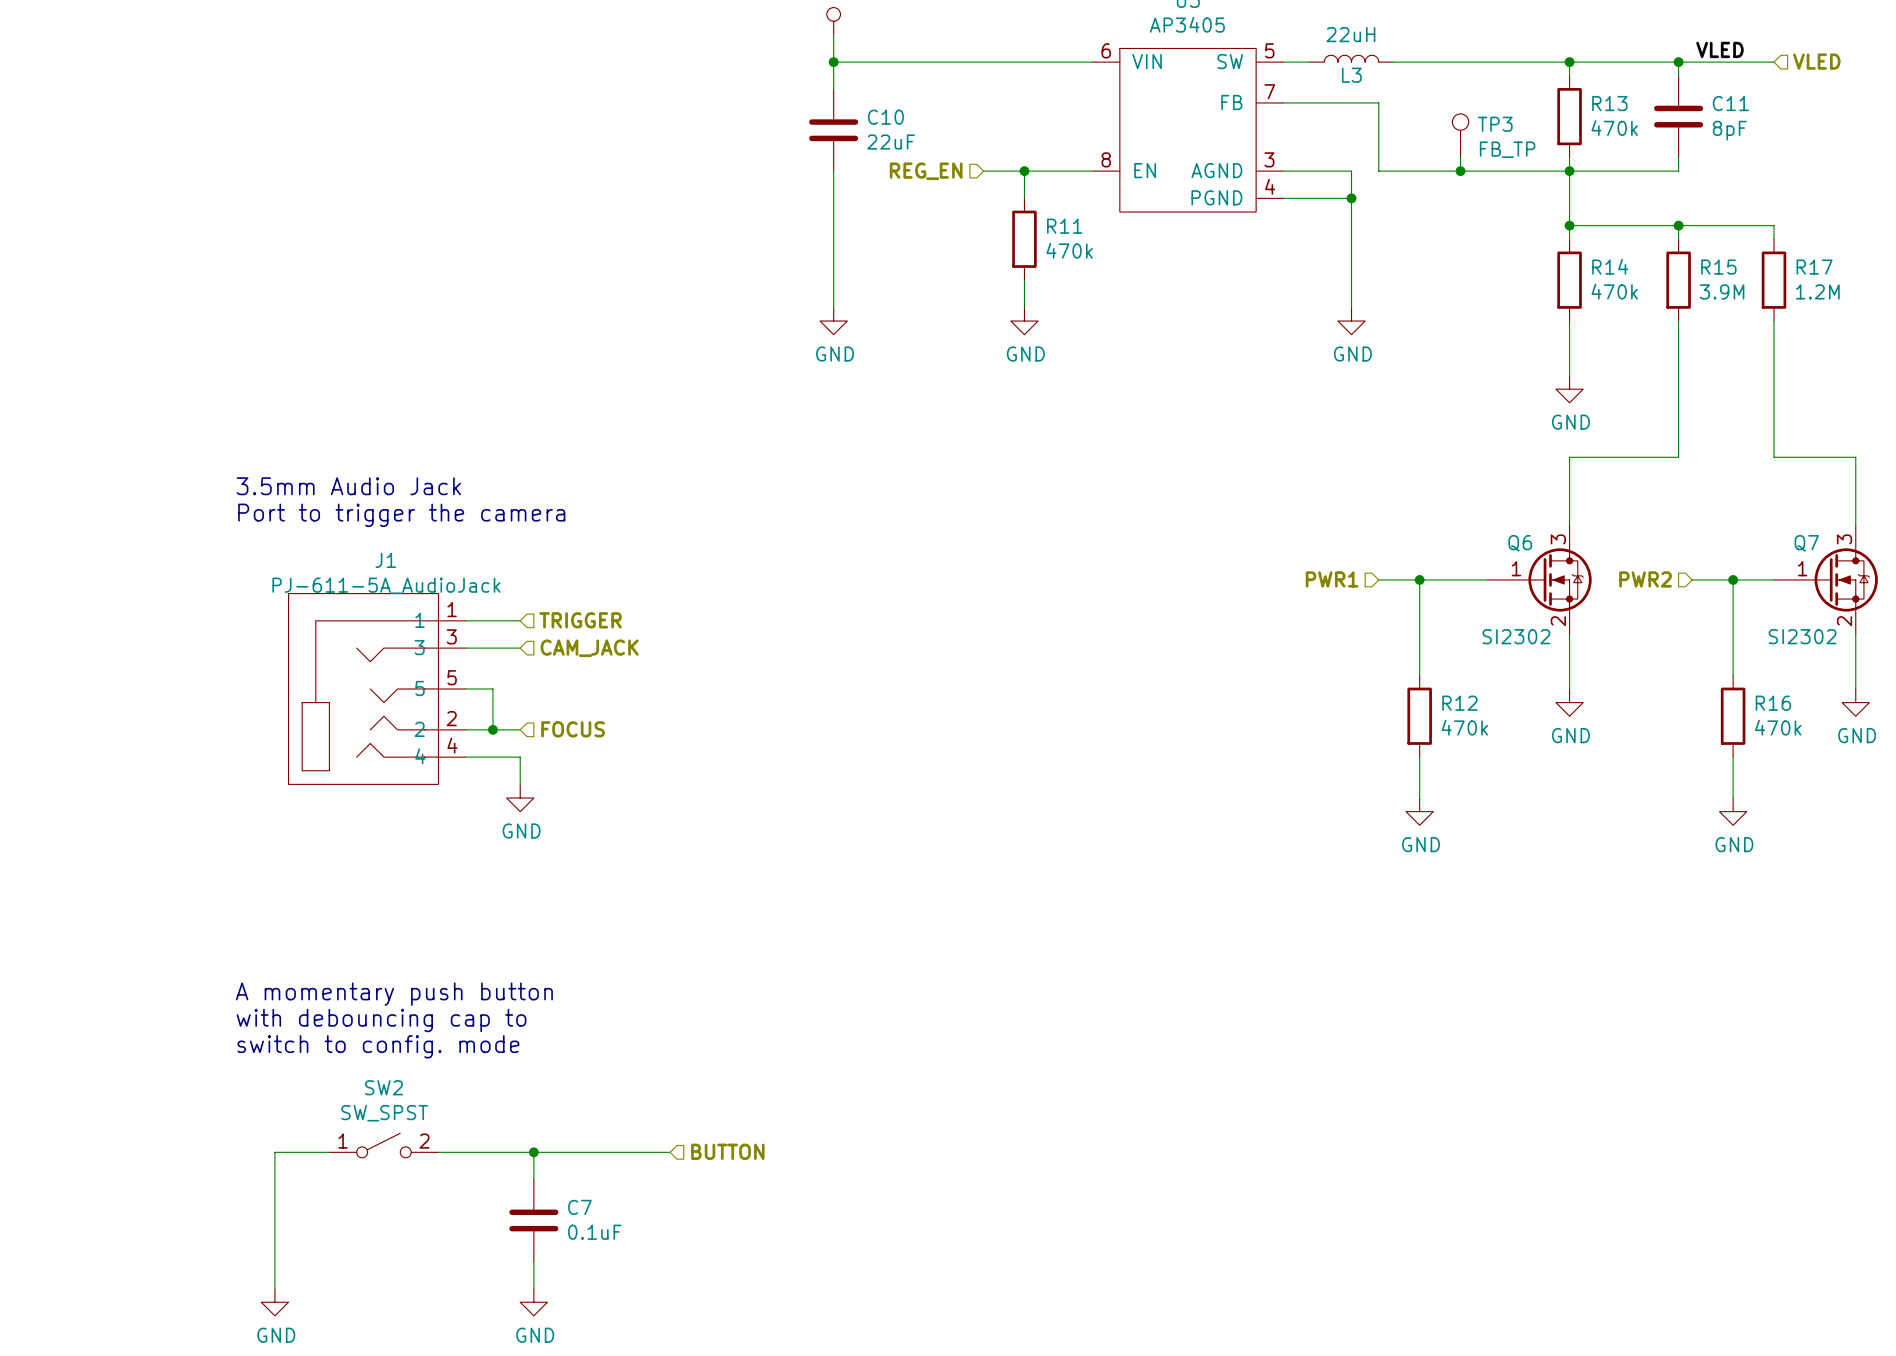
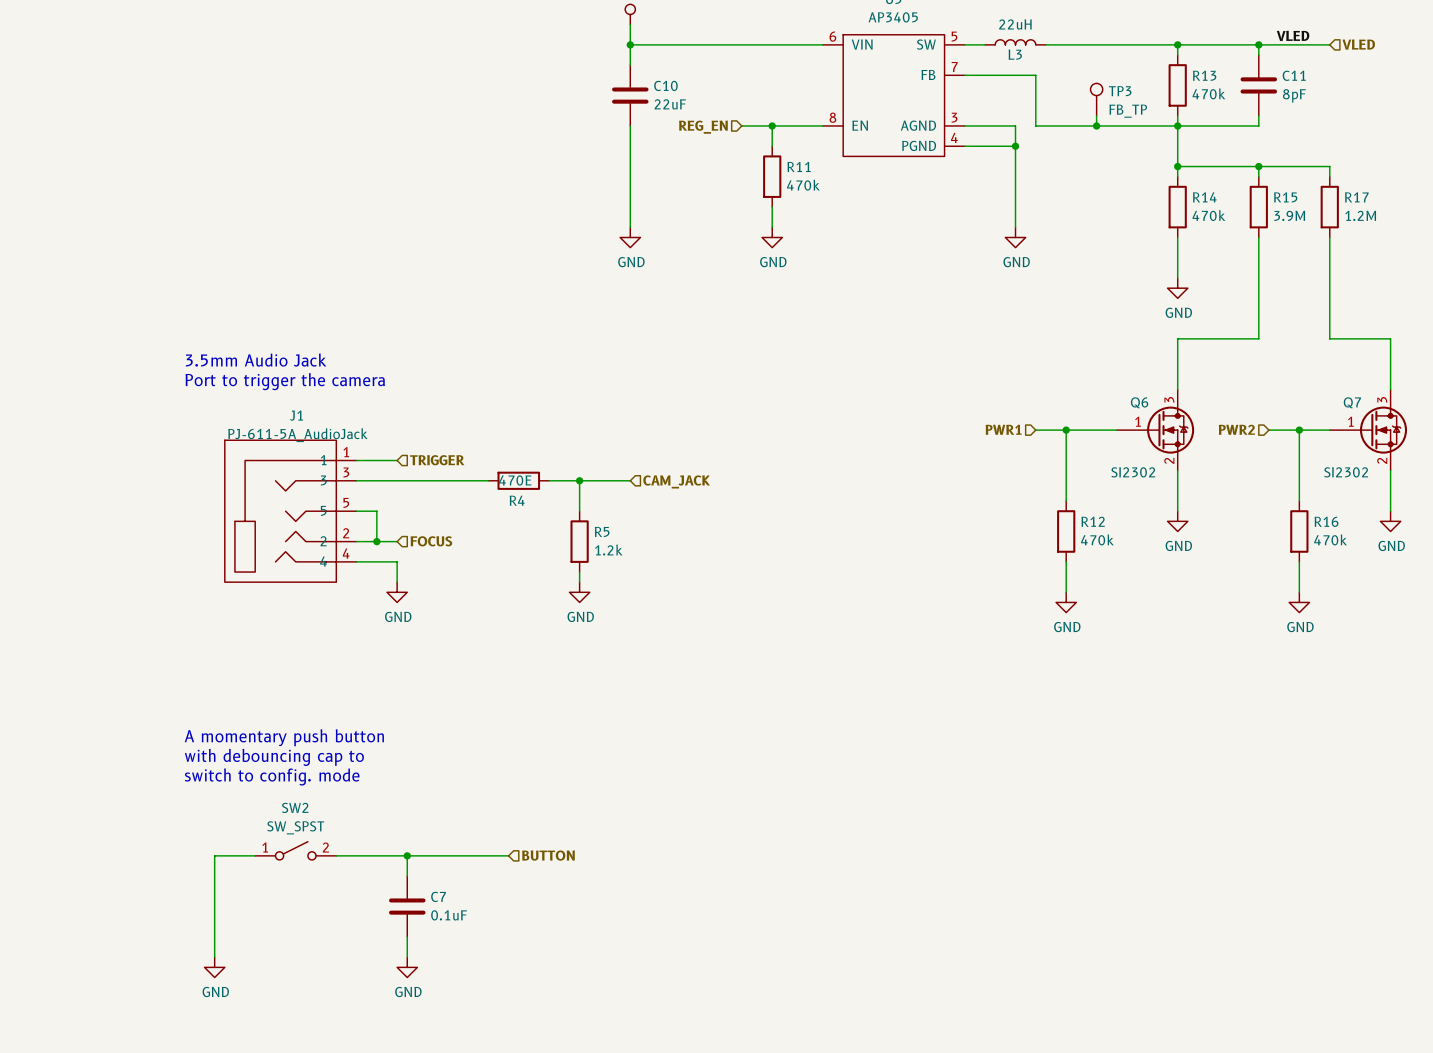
wire: none -> (397, 480) (488, 480)
hierarchical label: CAM_JACK (589, 648) -> none
R4: none -> 470E (518, 480)
wire: none -> (549, 480) (630, 480)
wire: none -> (579, 480) (579, 511)
junction: none -> (579, 480)
hierarchical label: none -> CAM_JACK (676, 481)
R5: none -> 1.2k (579, 541)
wire: none -> (579, 572) (579, 582)
power symbol: none -> GND (579, 592)

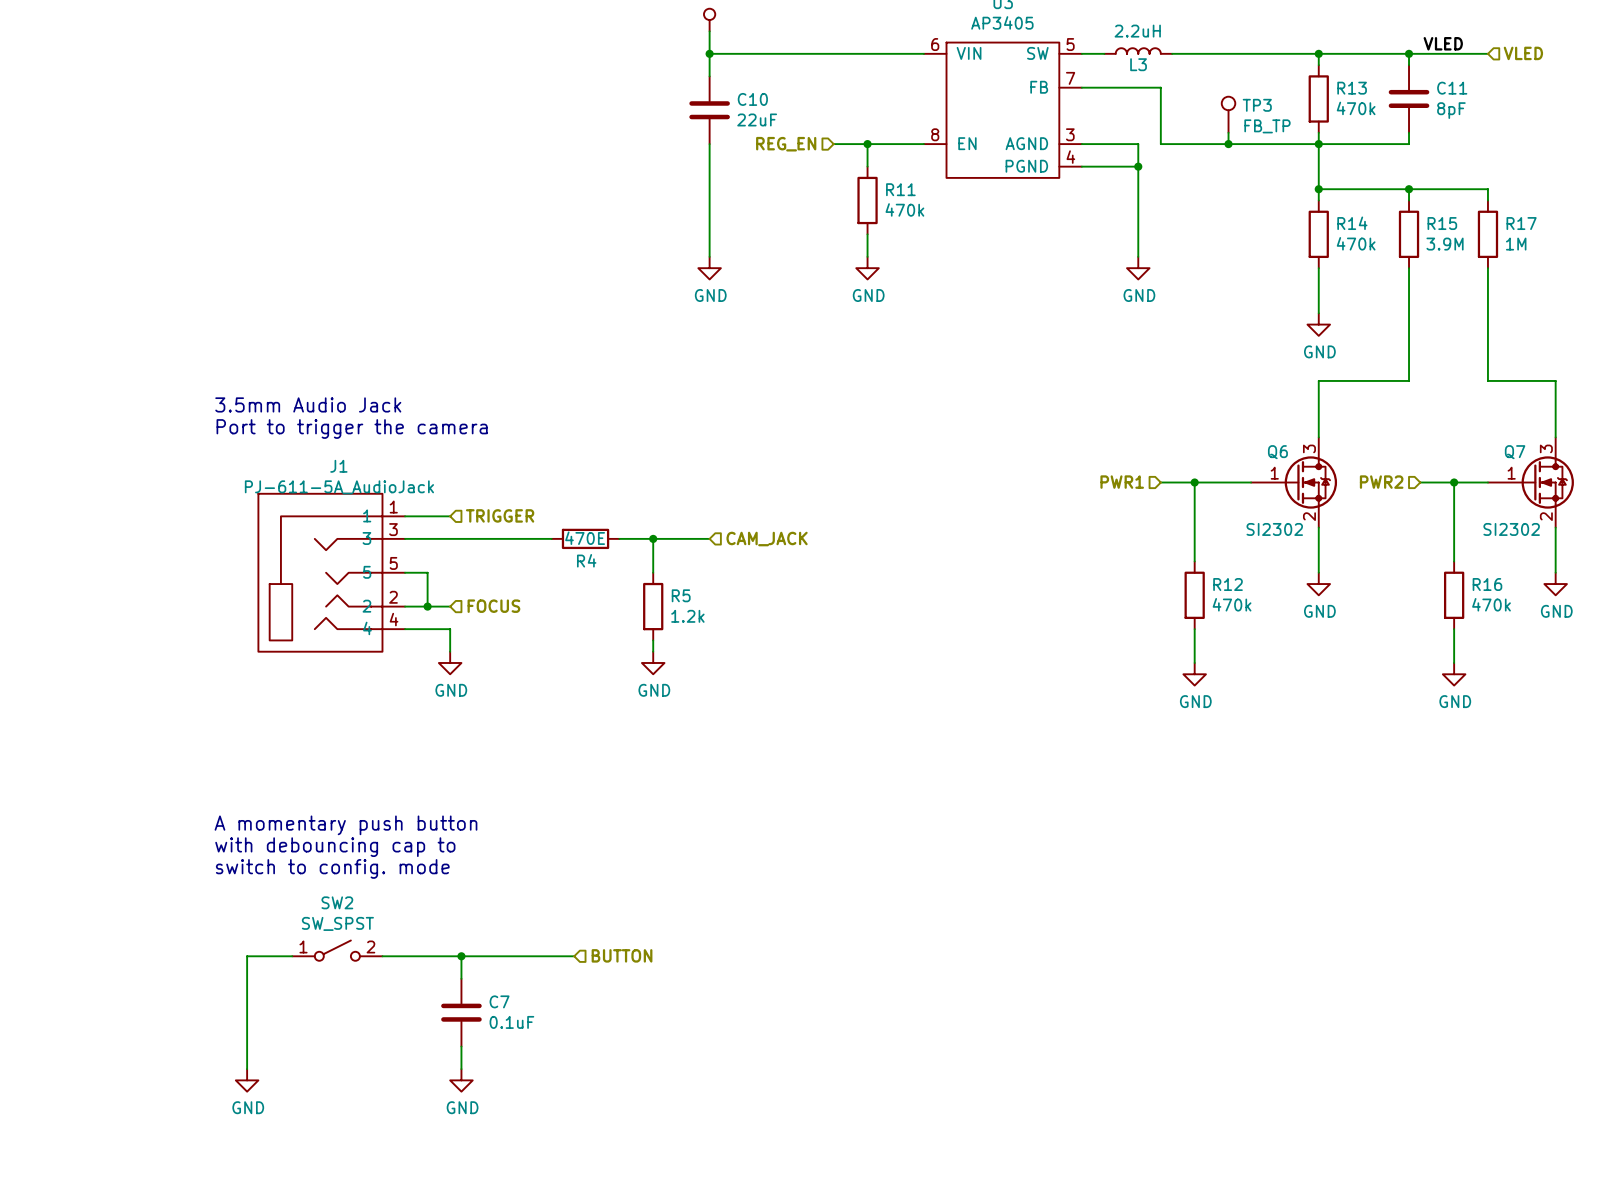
L3 value: 22uH (1015, 24) -> 2.2uH (1137, 31)
R17 value: 1.2M (1360, 215) -> 1M (1516, 244)

